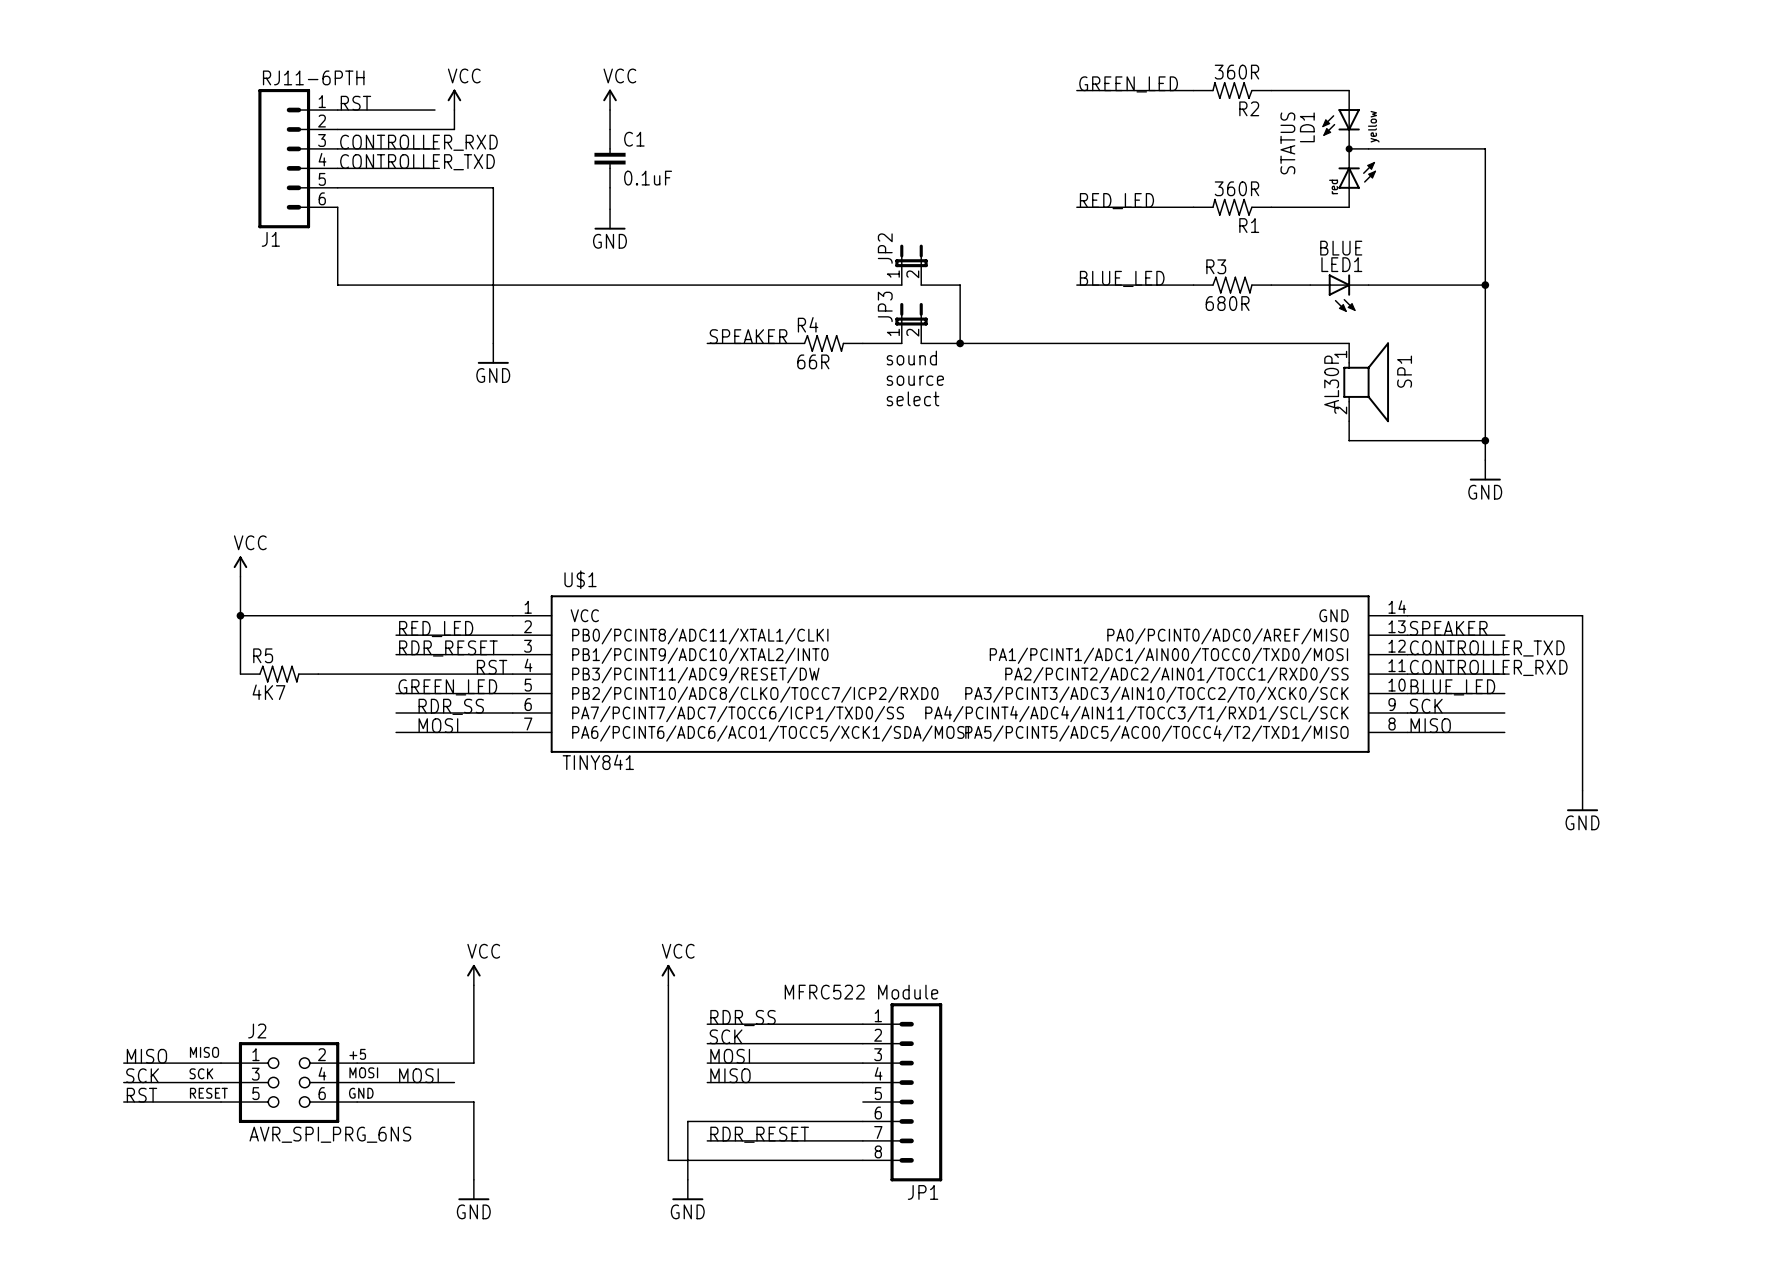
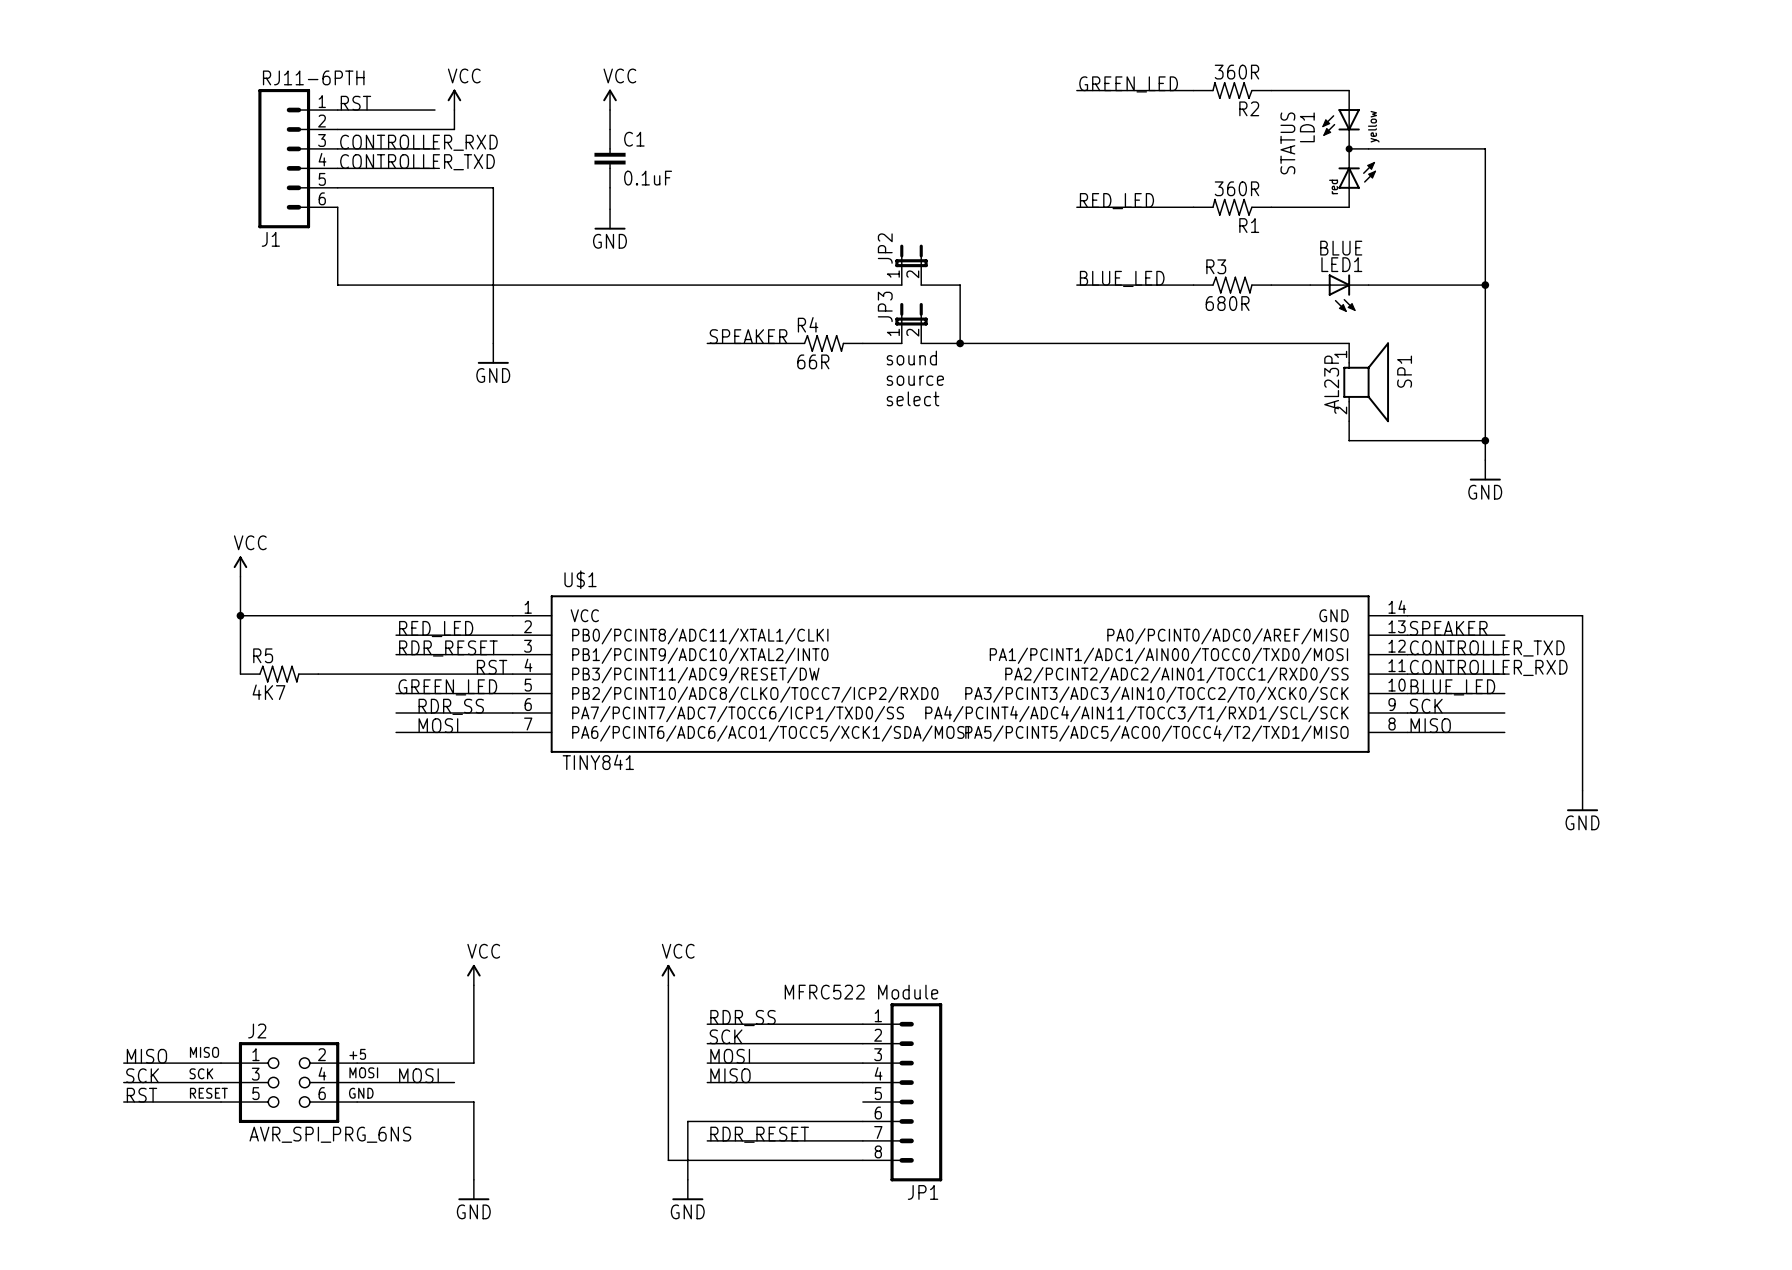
SP1 value: AL30P (1331, 382) -> AL23P (1331, 382)

